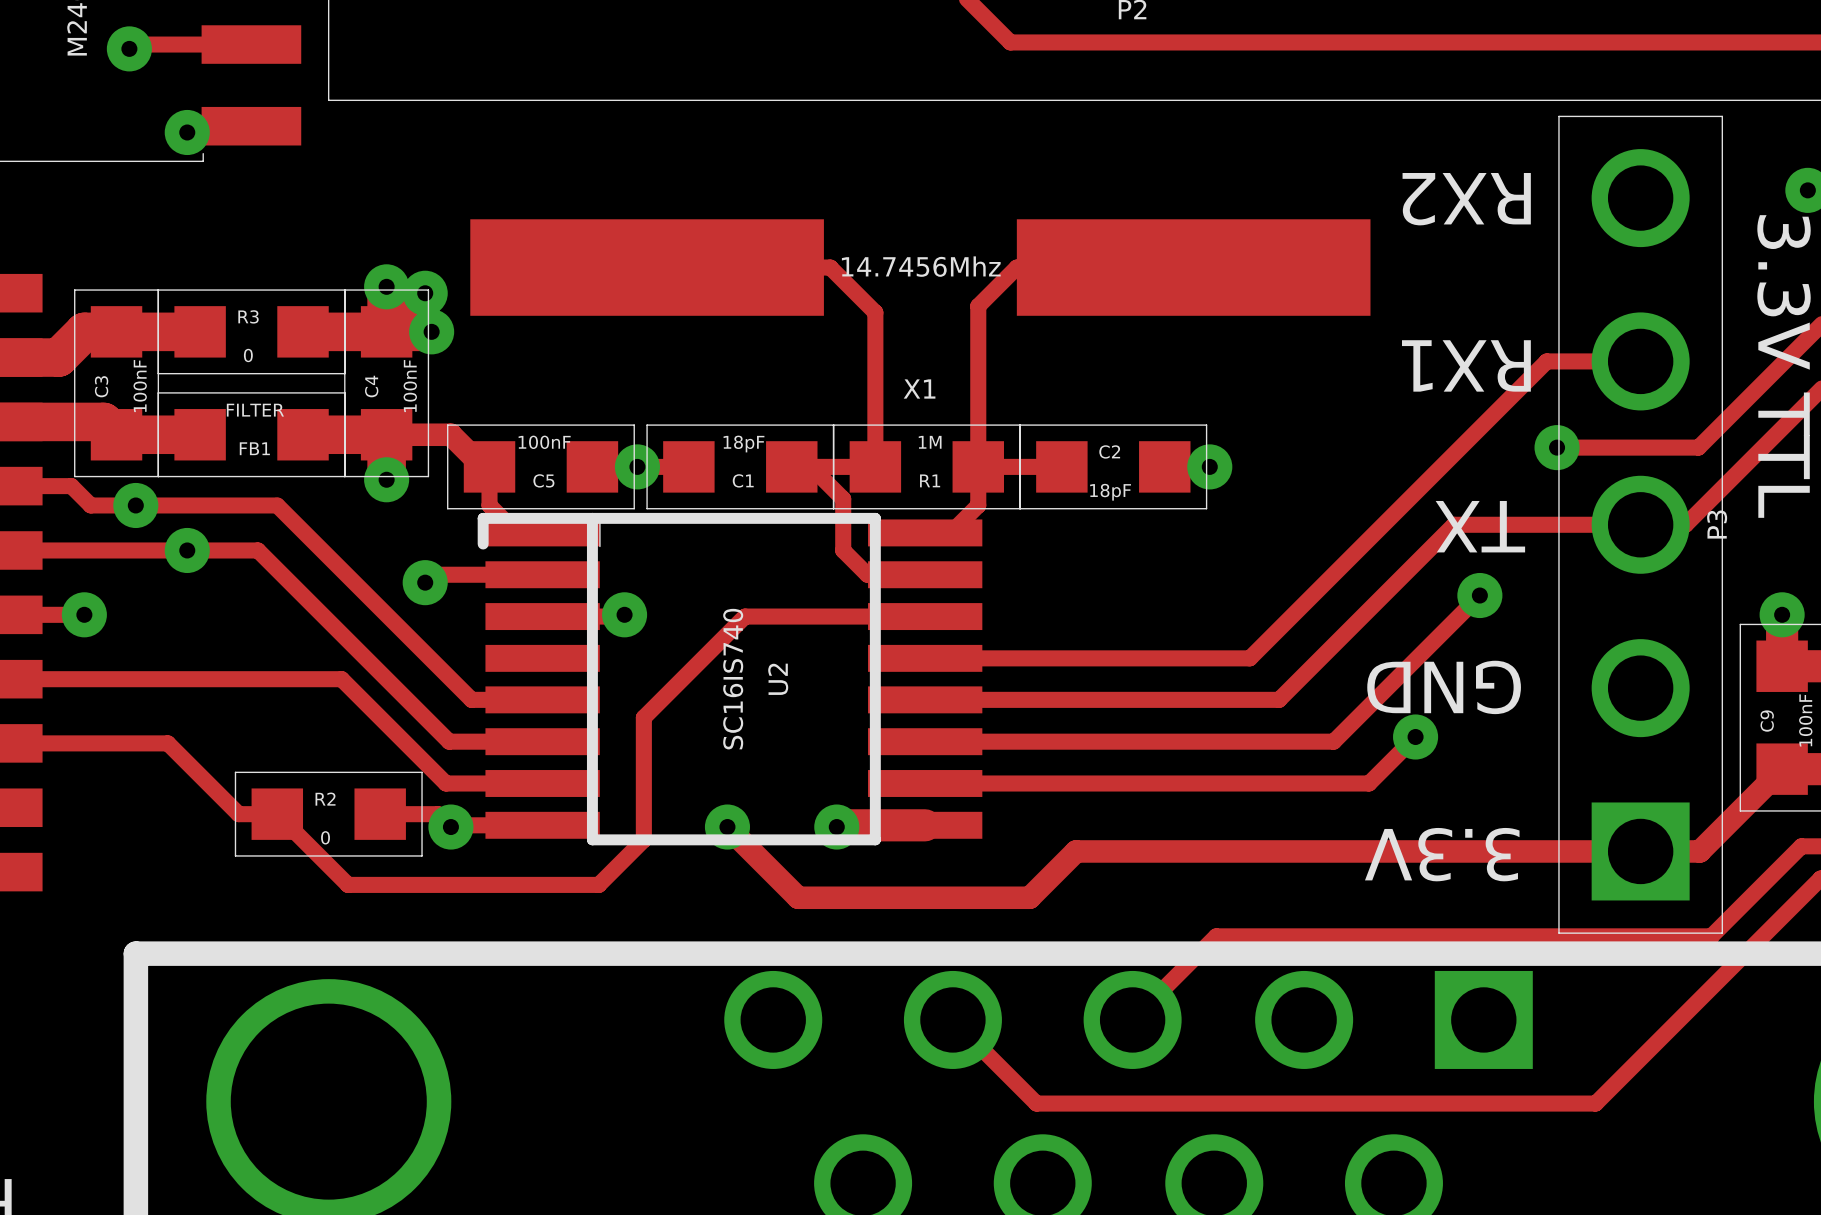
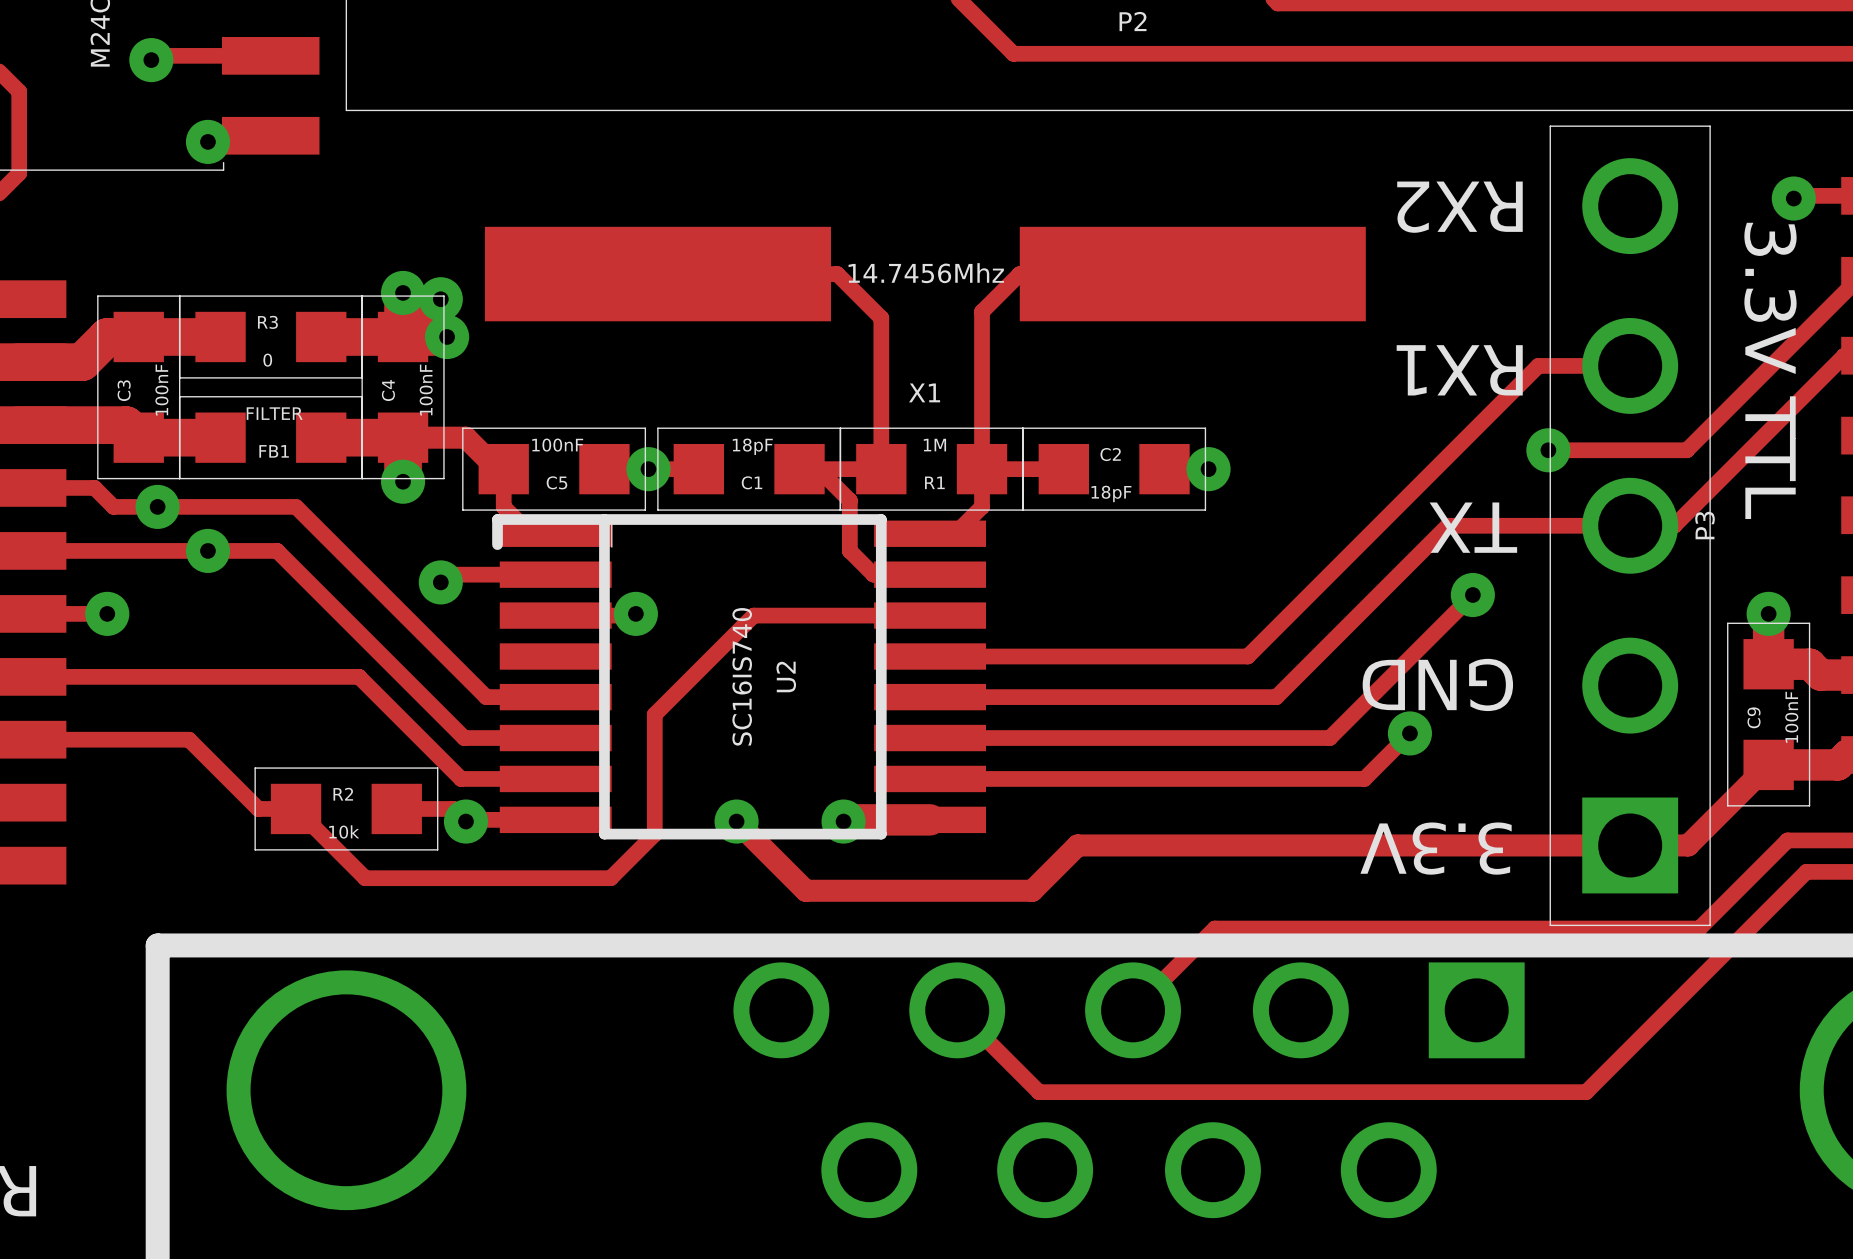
R2 value: 0 (325, 837) -> 10k (344, 831)

